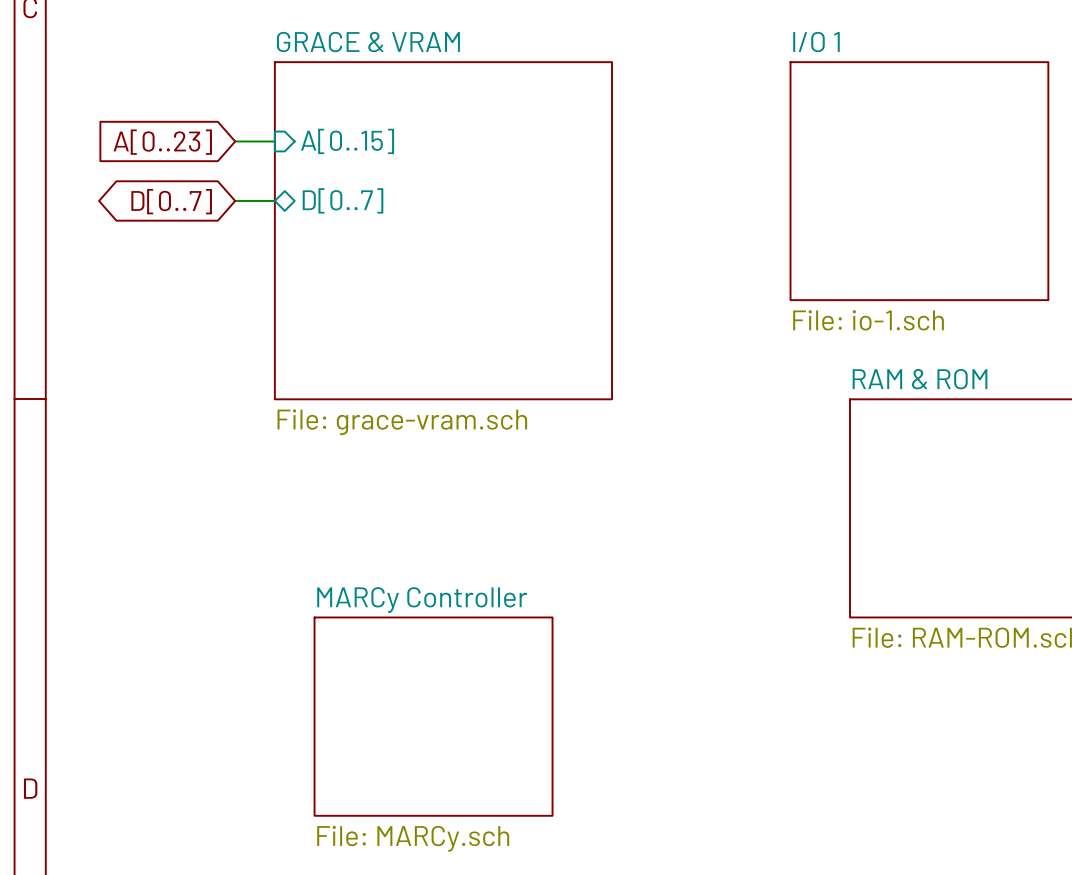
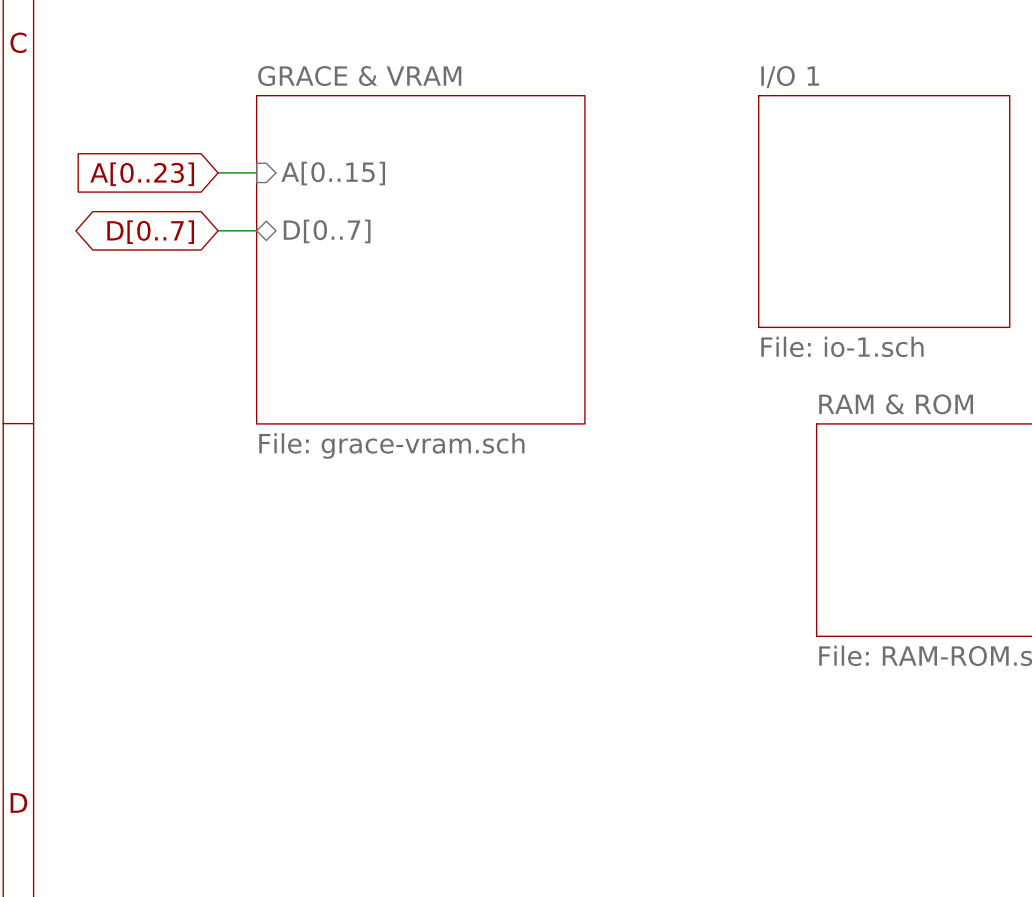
sheet MARCy Controller: File: MARCy.sch (433, 716) -> none

